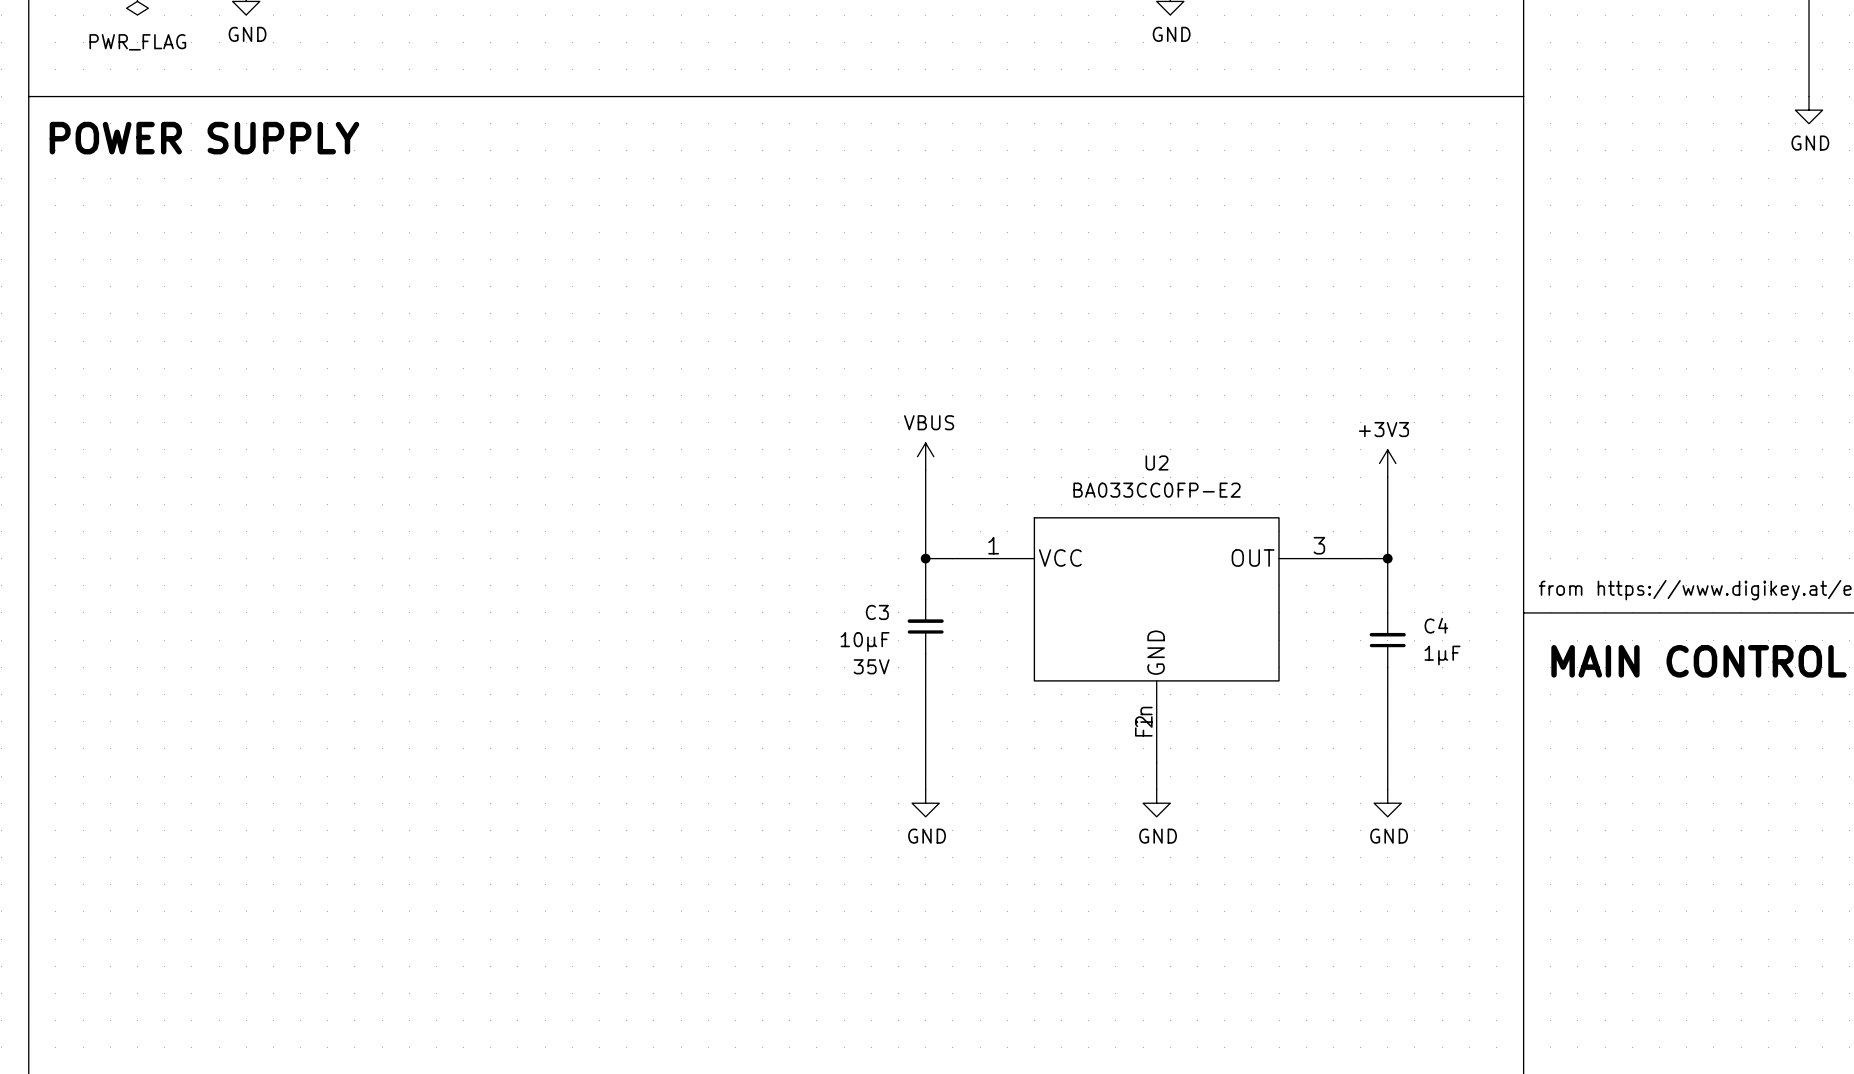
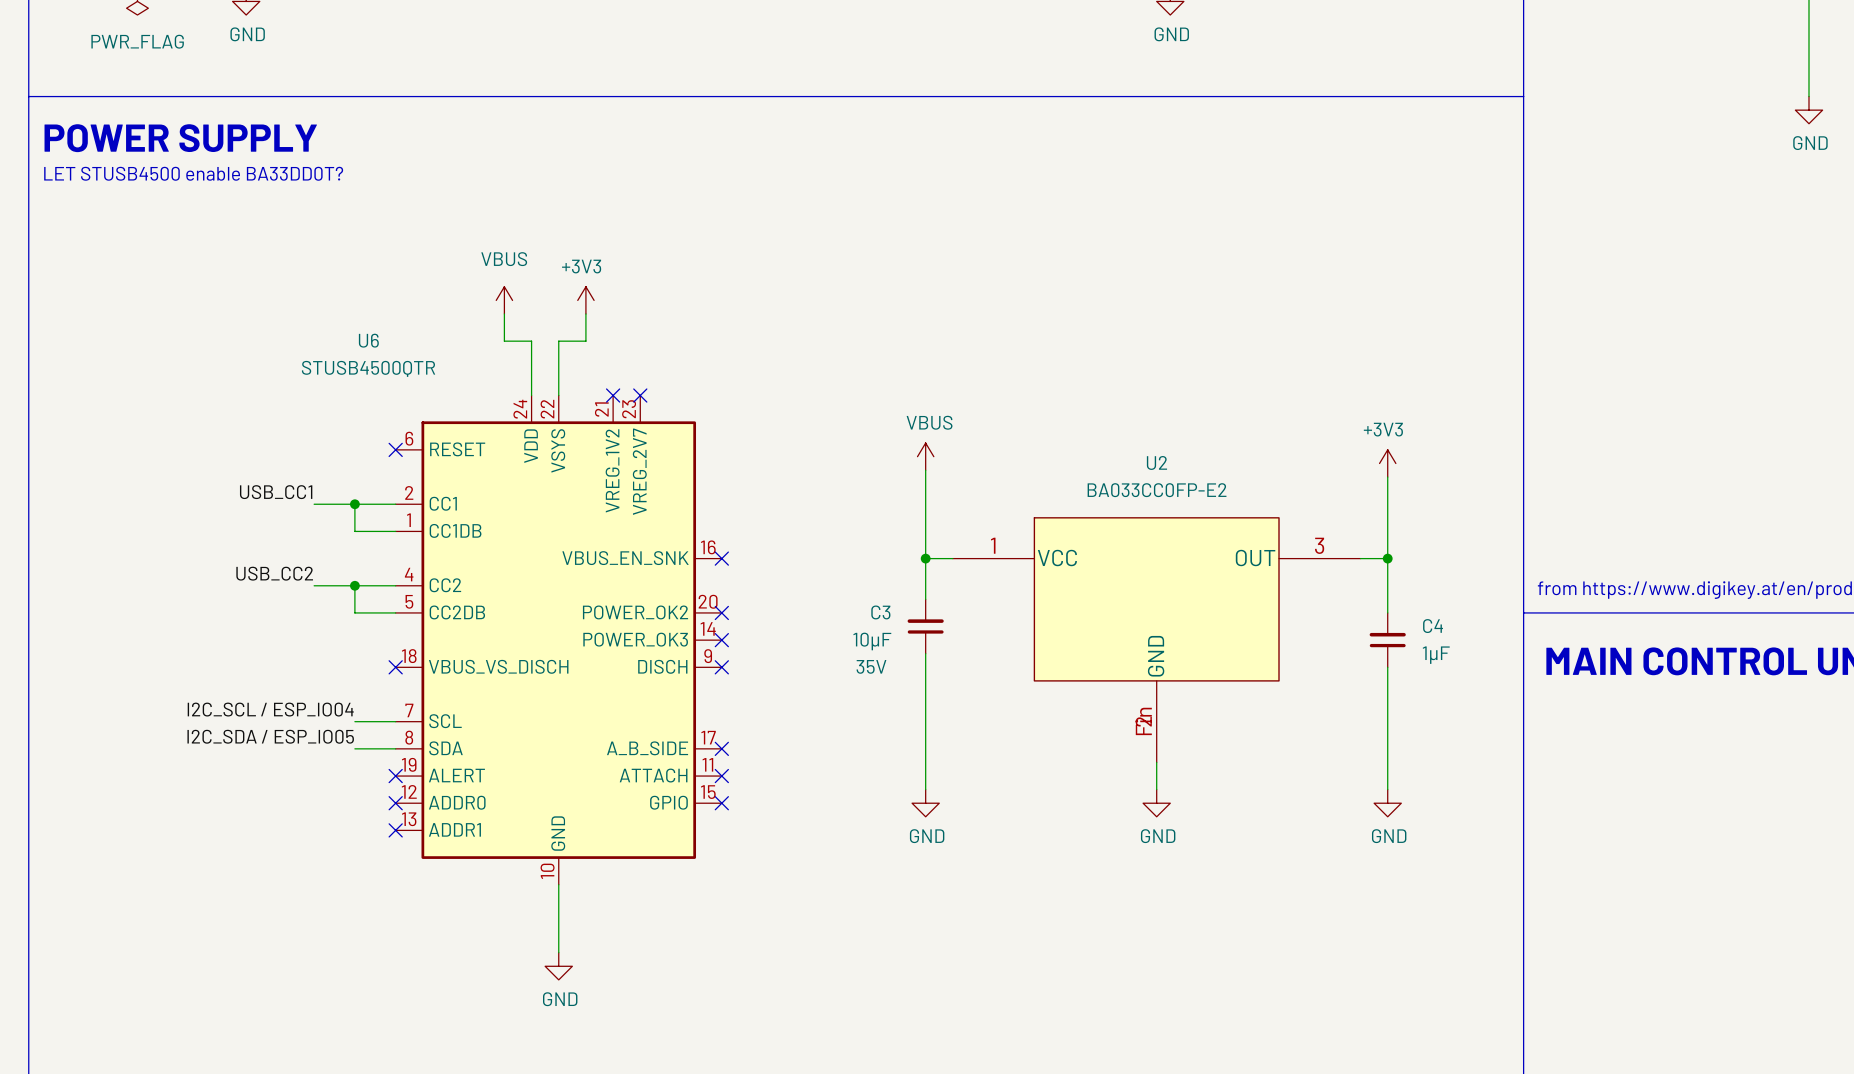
text: none -> LET STUSB4500 enable BA33DD0T? (193, 173)
power symbol: none -> VBUS (504, 300)
power symbol: none -> +3V3 (585, 300)
wire: none -> (504, 313) (504, 341) (531, 341) (531, 395)
wire: none -> (585, 313) (585, 341) (558, 341) (558, 395)
no-connect mark: none -> (613, 395)
no-connect mark: none -> (640, 395)
no-connect mark: none -> (395, 449)
label: none -> USB_CC1 (276, 492)
wire: none -> (314, 504) (395, 504)
wire: none -> (354, 504) (354, 531) (395, 531)
junction: none -> (354, 504)
no-connect mark: none -> (721, 558)
label: none -> USB_CC2 (274, 573)
wire: none -> (314, 585) (395, 585)
wire: none -> (354, 585) (354, 612) (395, 612)
junction: none -> (354, 585)
no-connect mark: none -> (721, 612)
U6: none -> STUSB4500QTR (558, 640)
no-connect mark: none -> (721, 640)
no-connect mark: none -> (395, 667)
no-connect mark: none -> (721, 667)
label: none -> I2C_SCL / ESP_IO04 (270, 709)
wire: none -> (354, 721) (395, 721)
label: none -> I2C_SDA / ESP_IO05 (270, 736)
wire: none -> (354, 748) (395, 748)
no-connect mark: none -> (721, 748)
no-connect mark: none -> (395, 776)
no-connect mark: none -> (721, 776)
no-connect mark: none -> (395, 803)
no-connect mark: none -> (721, 803)
no-connect mark: none -> (395, 830)
wire: none -> (558, 884) (558, 952)
power symbol: none -> GND (558, 966)

